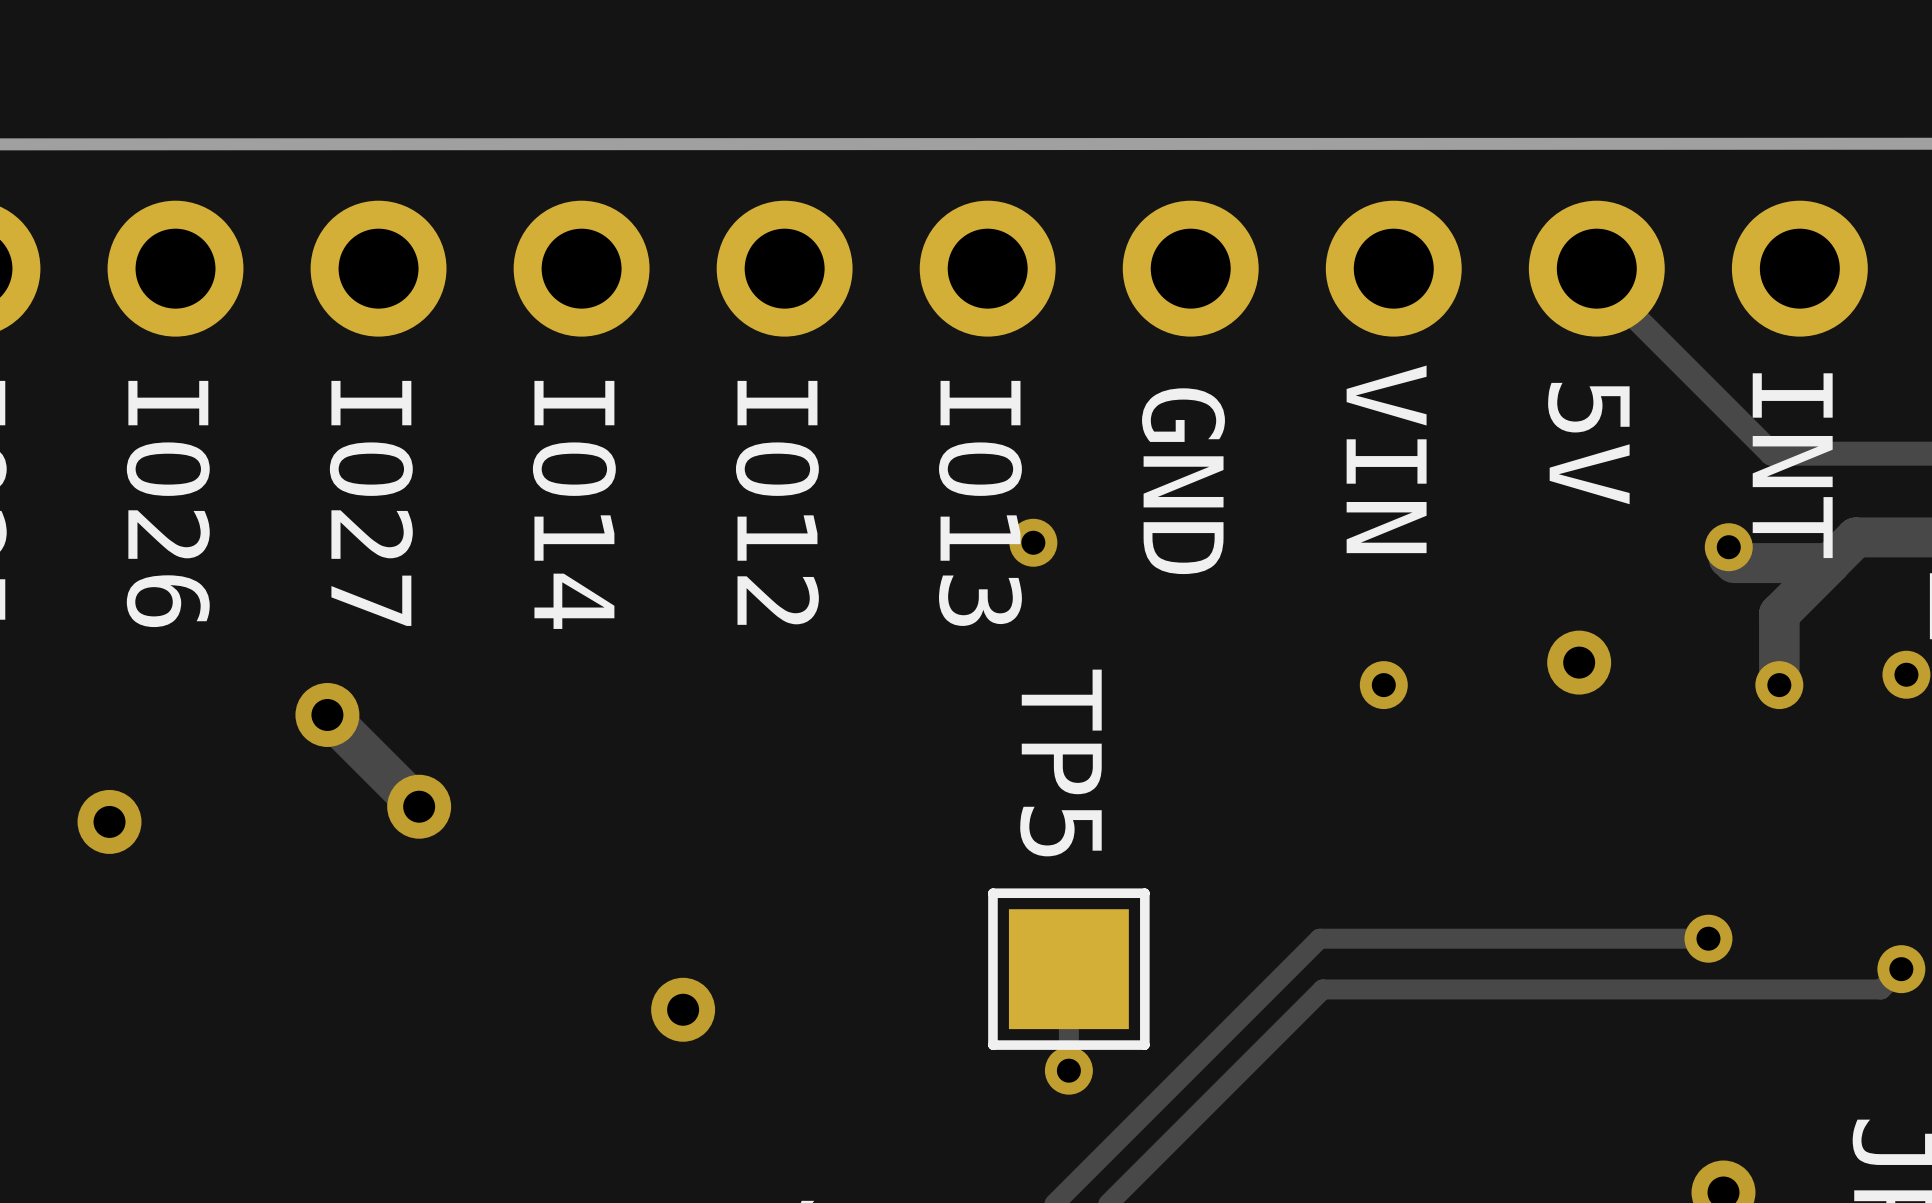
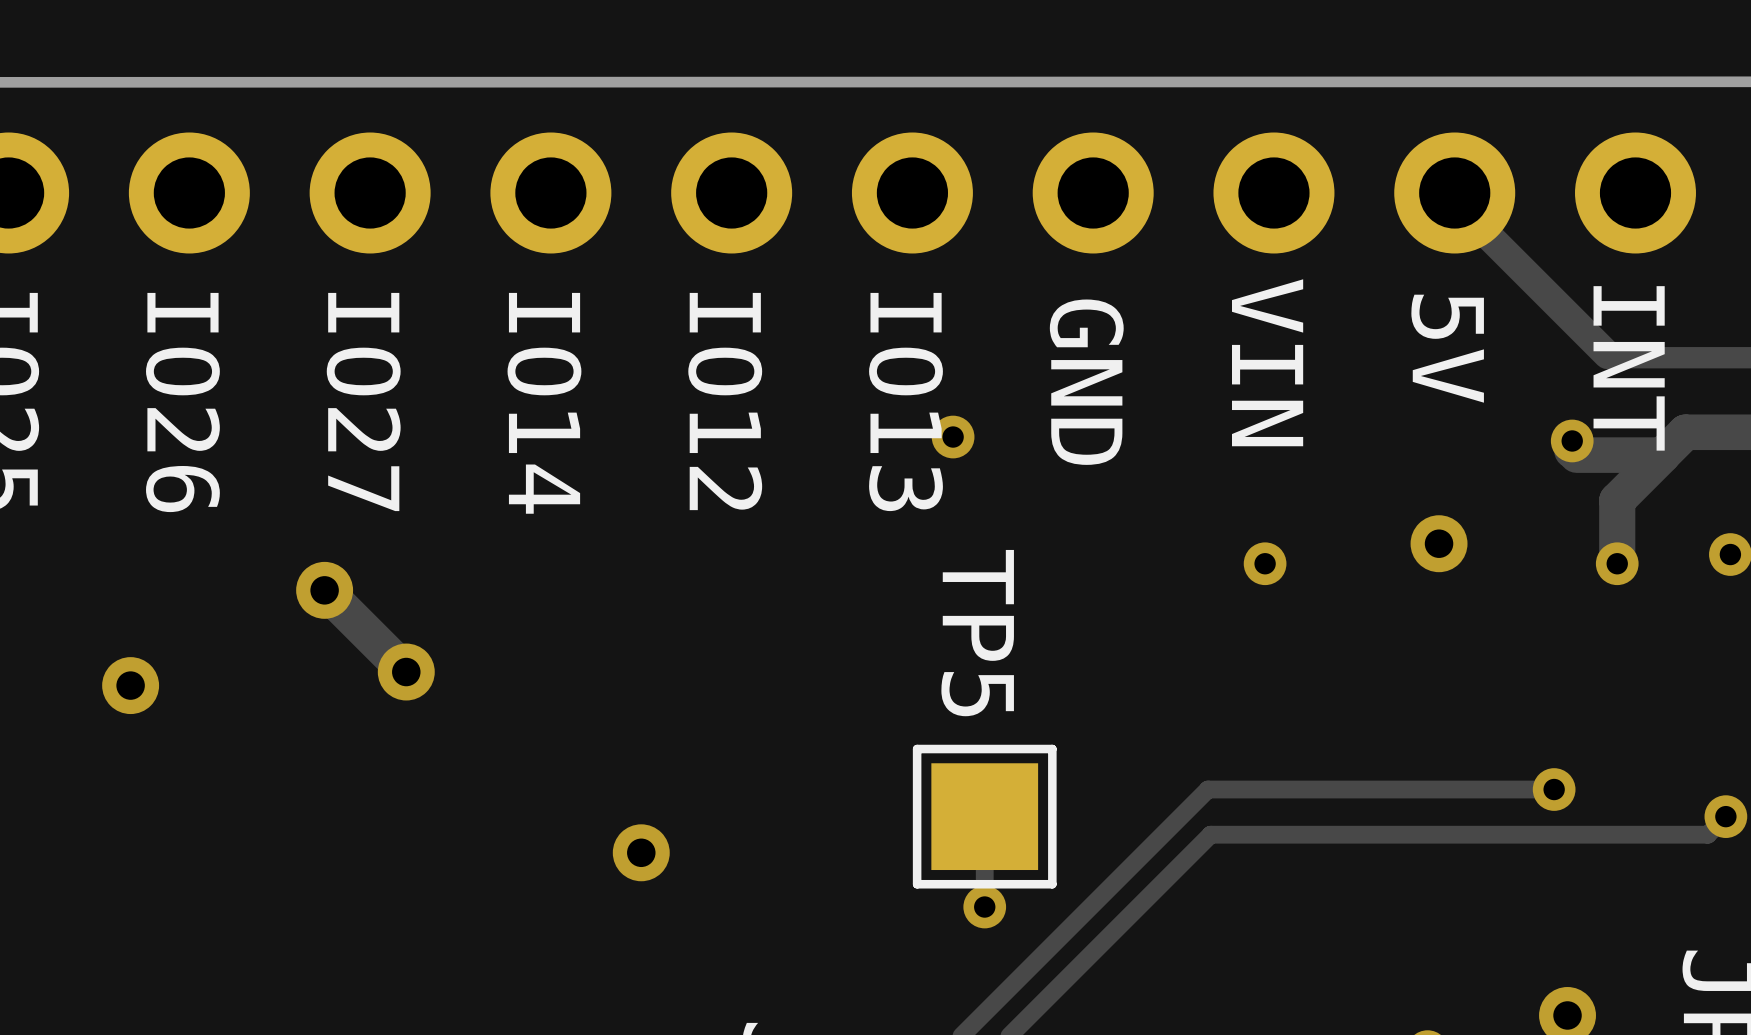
track width: thin (1596, 278) (1768, 450) -> thick (1454, 202) (1607, 354)

